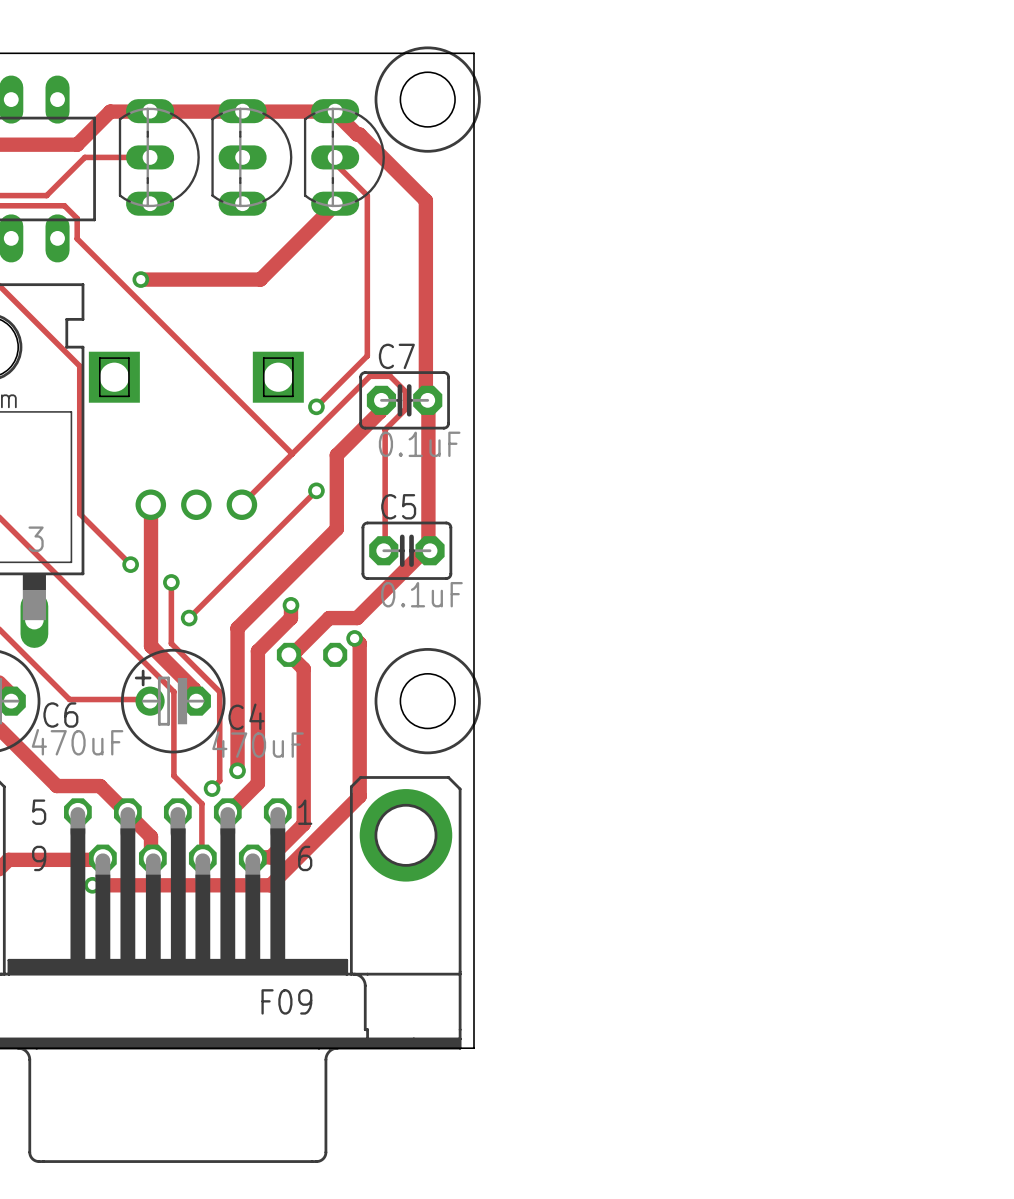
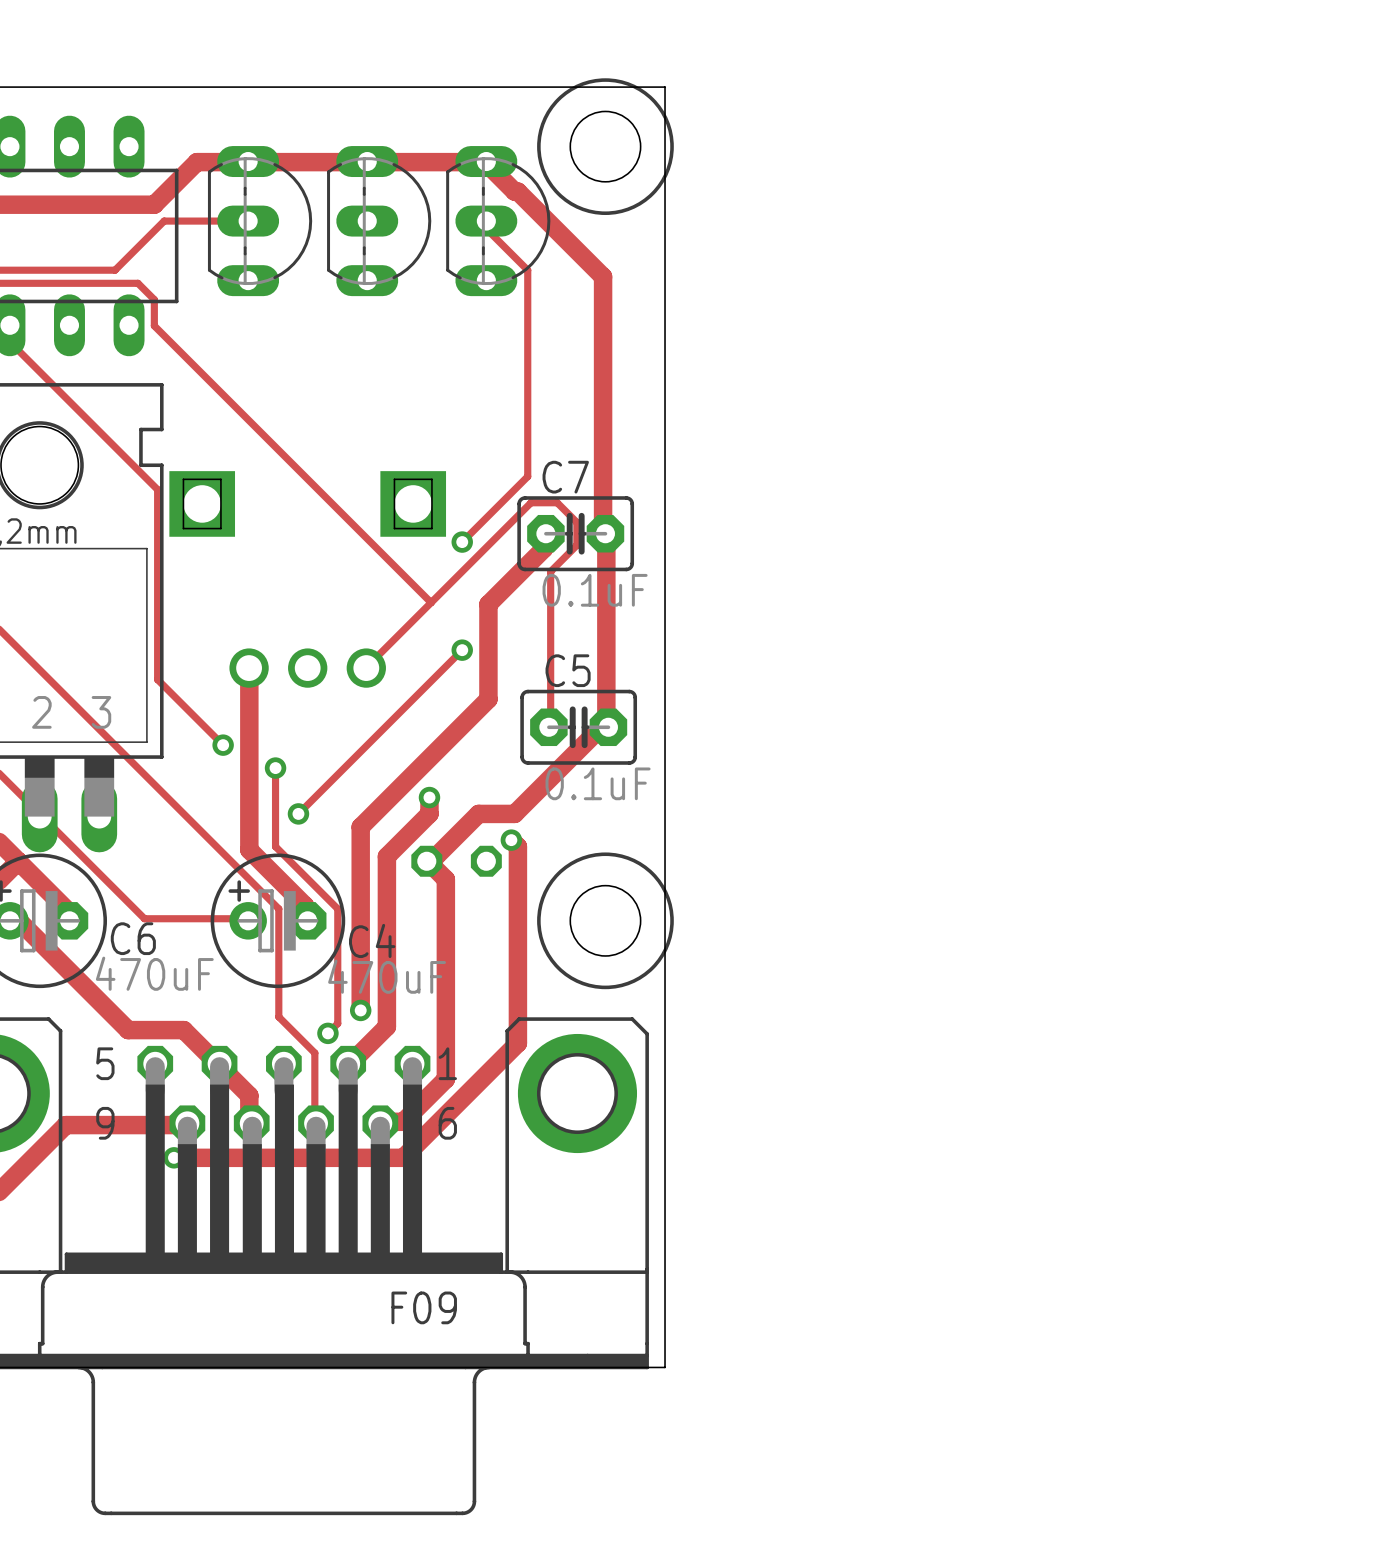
track: (335, 203) (260, 279) (140, 279) -> none
via: (140, 279) -> none

